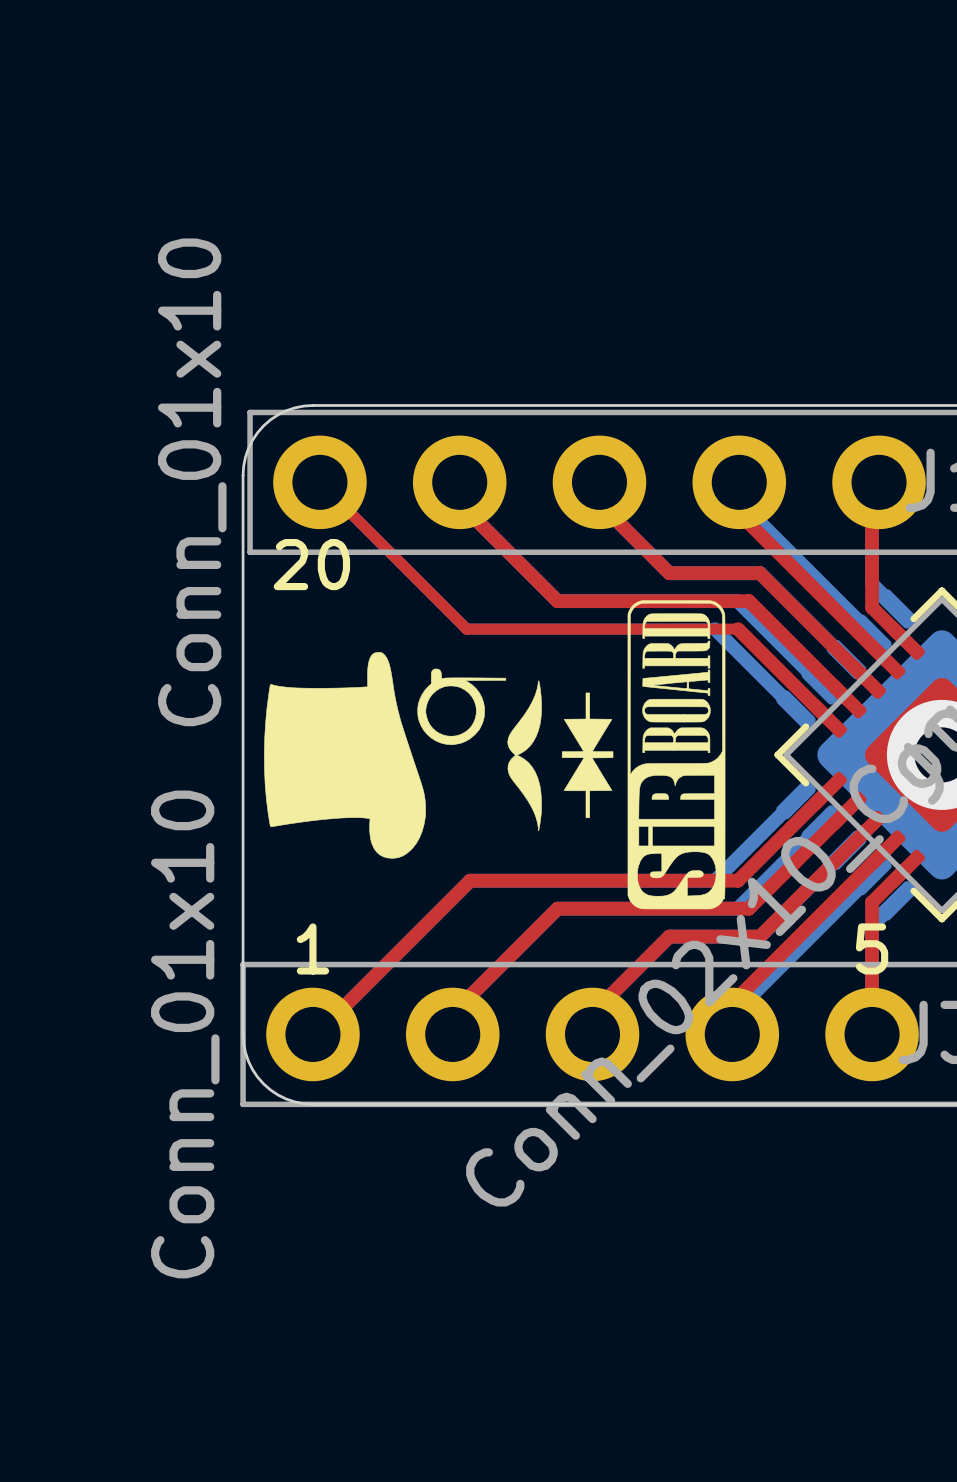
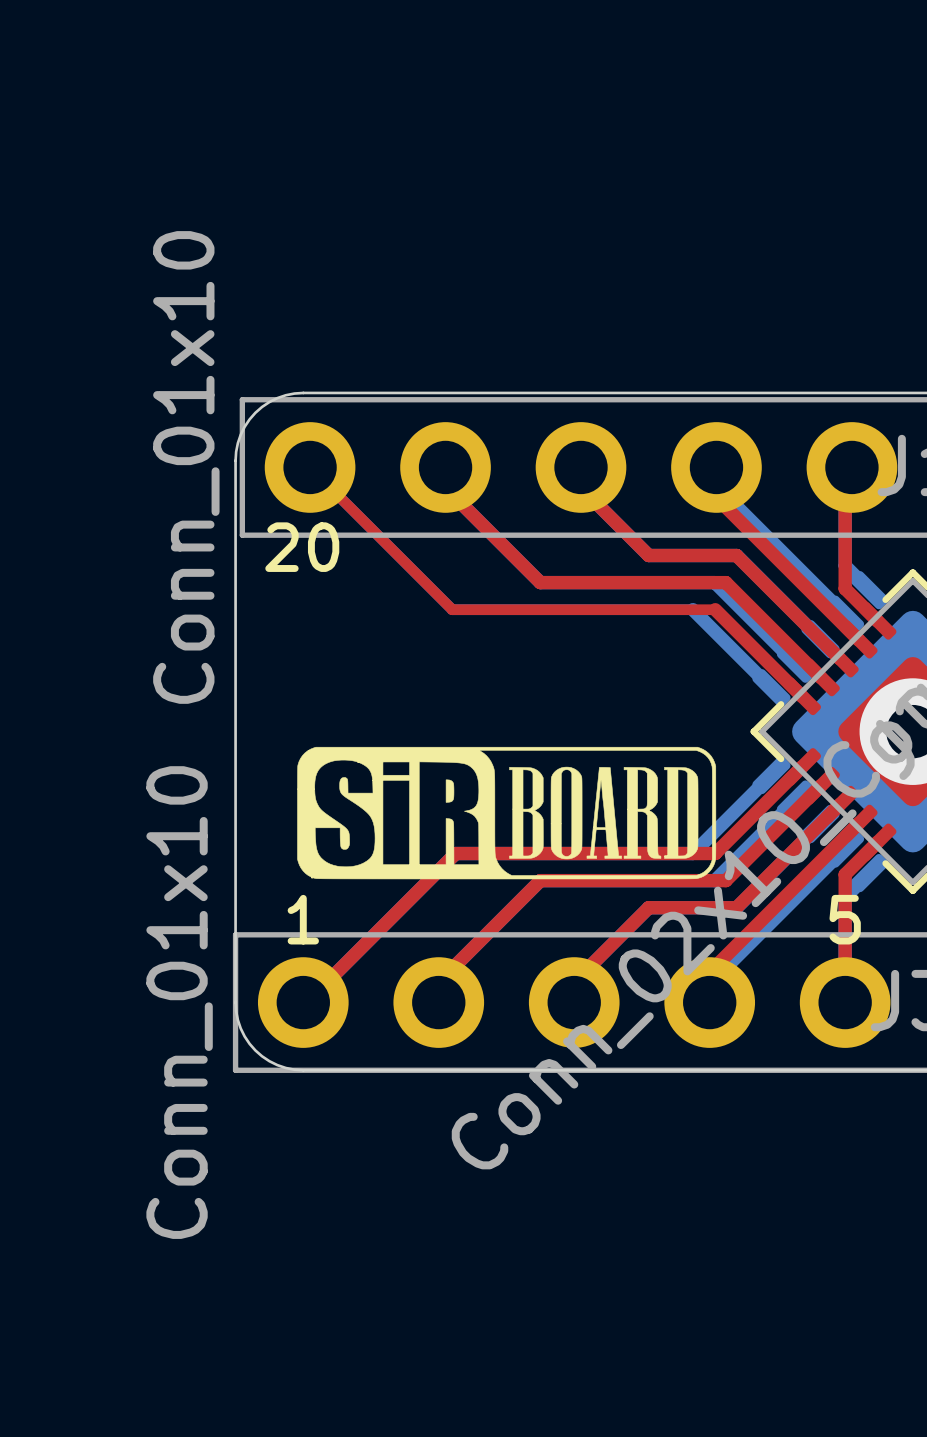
drawing: [264, 600, 726, 910] -> none
drawing: none -> [297, 746, 717, 880]

